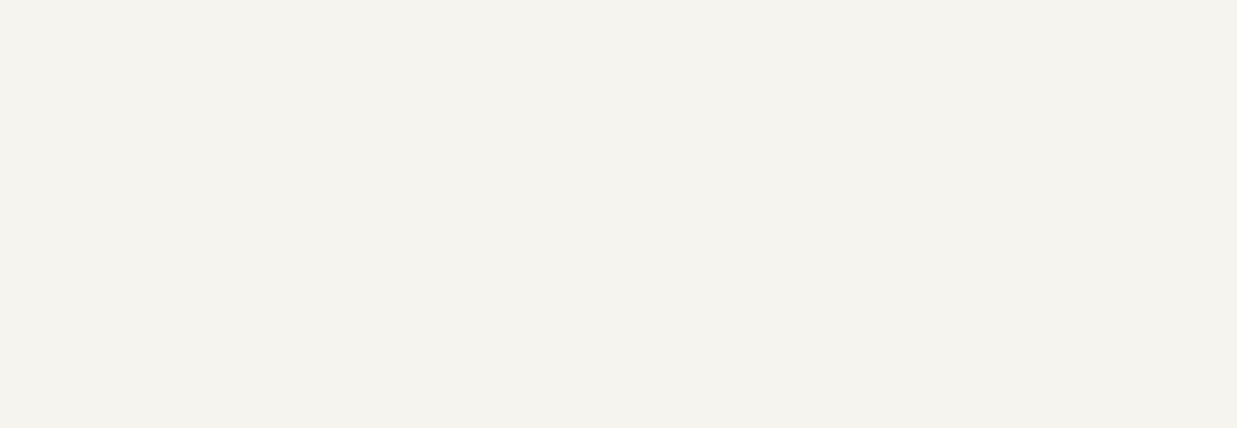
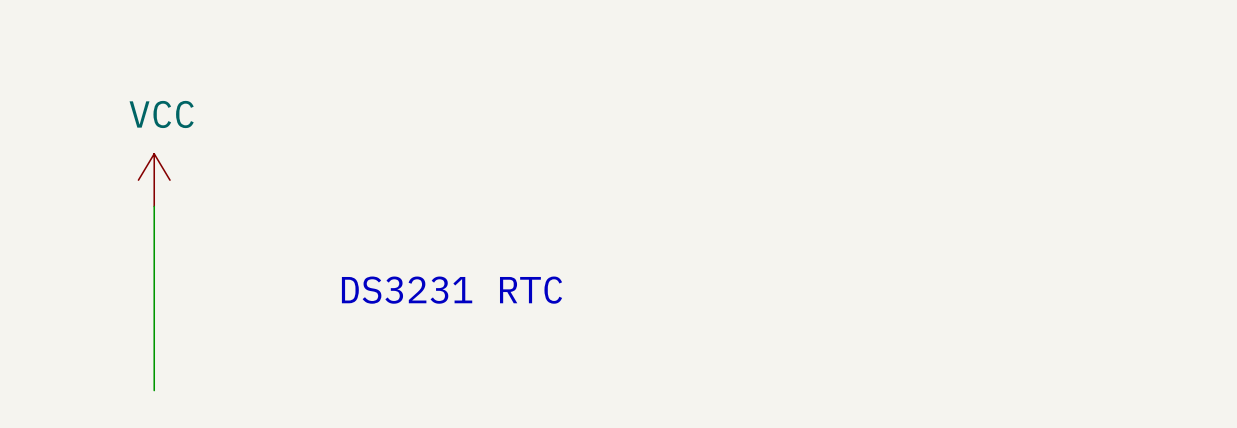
power symbol: none -> VCC (154, 180)
wire: none -> (154, 206) (154, 390)
text: none -> DS3231 RTC (452, 290)

